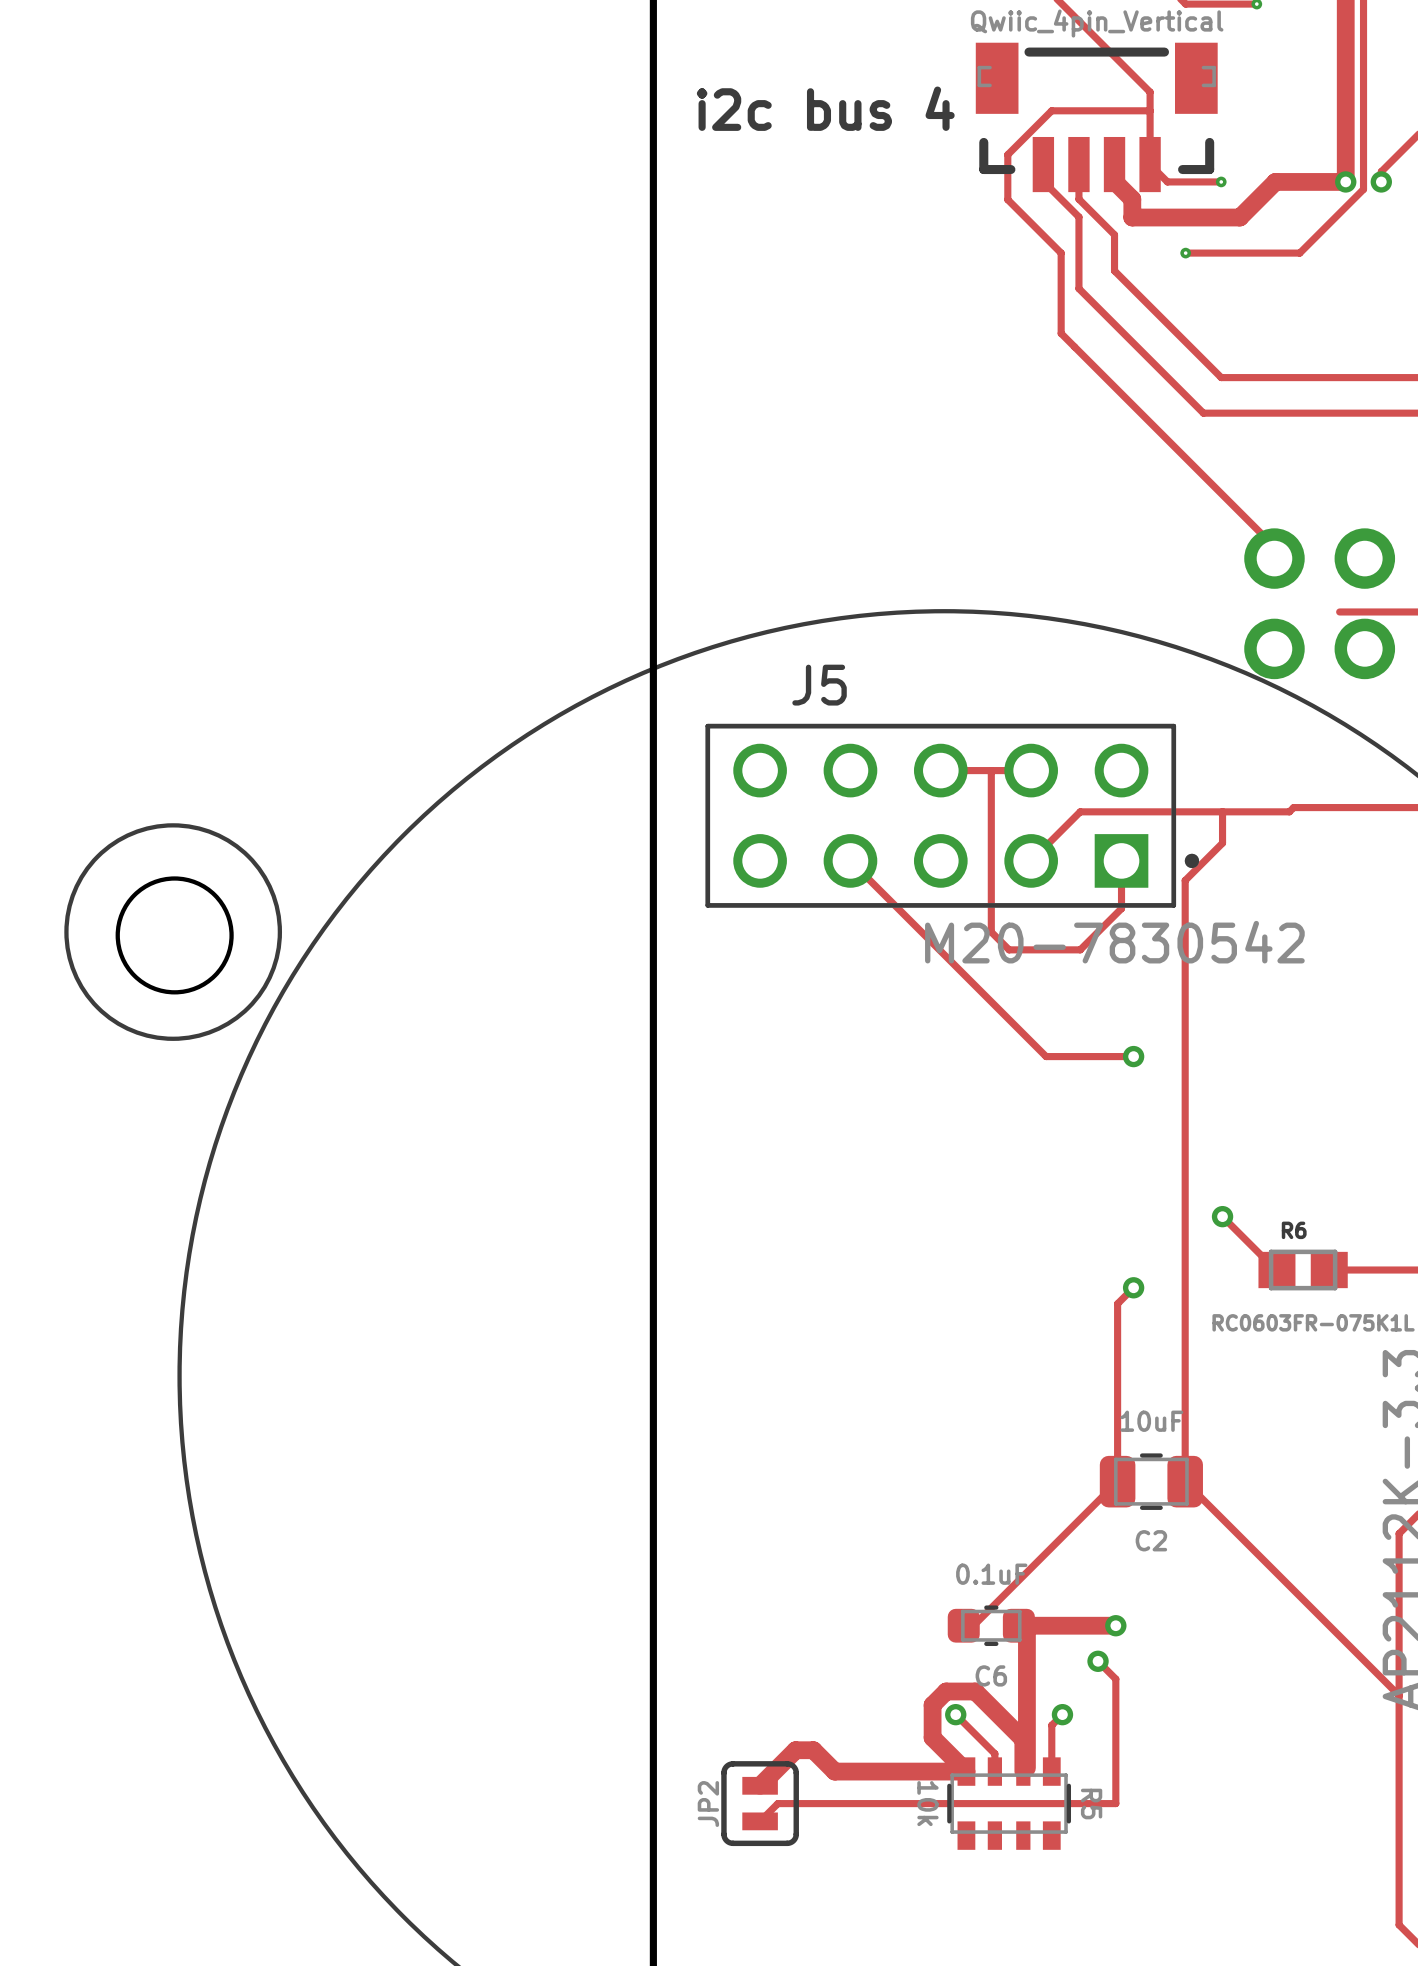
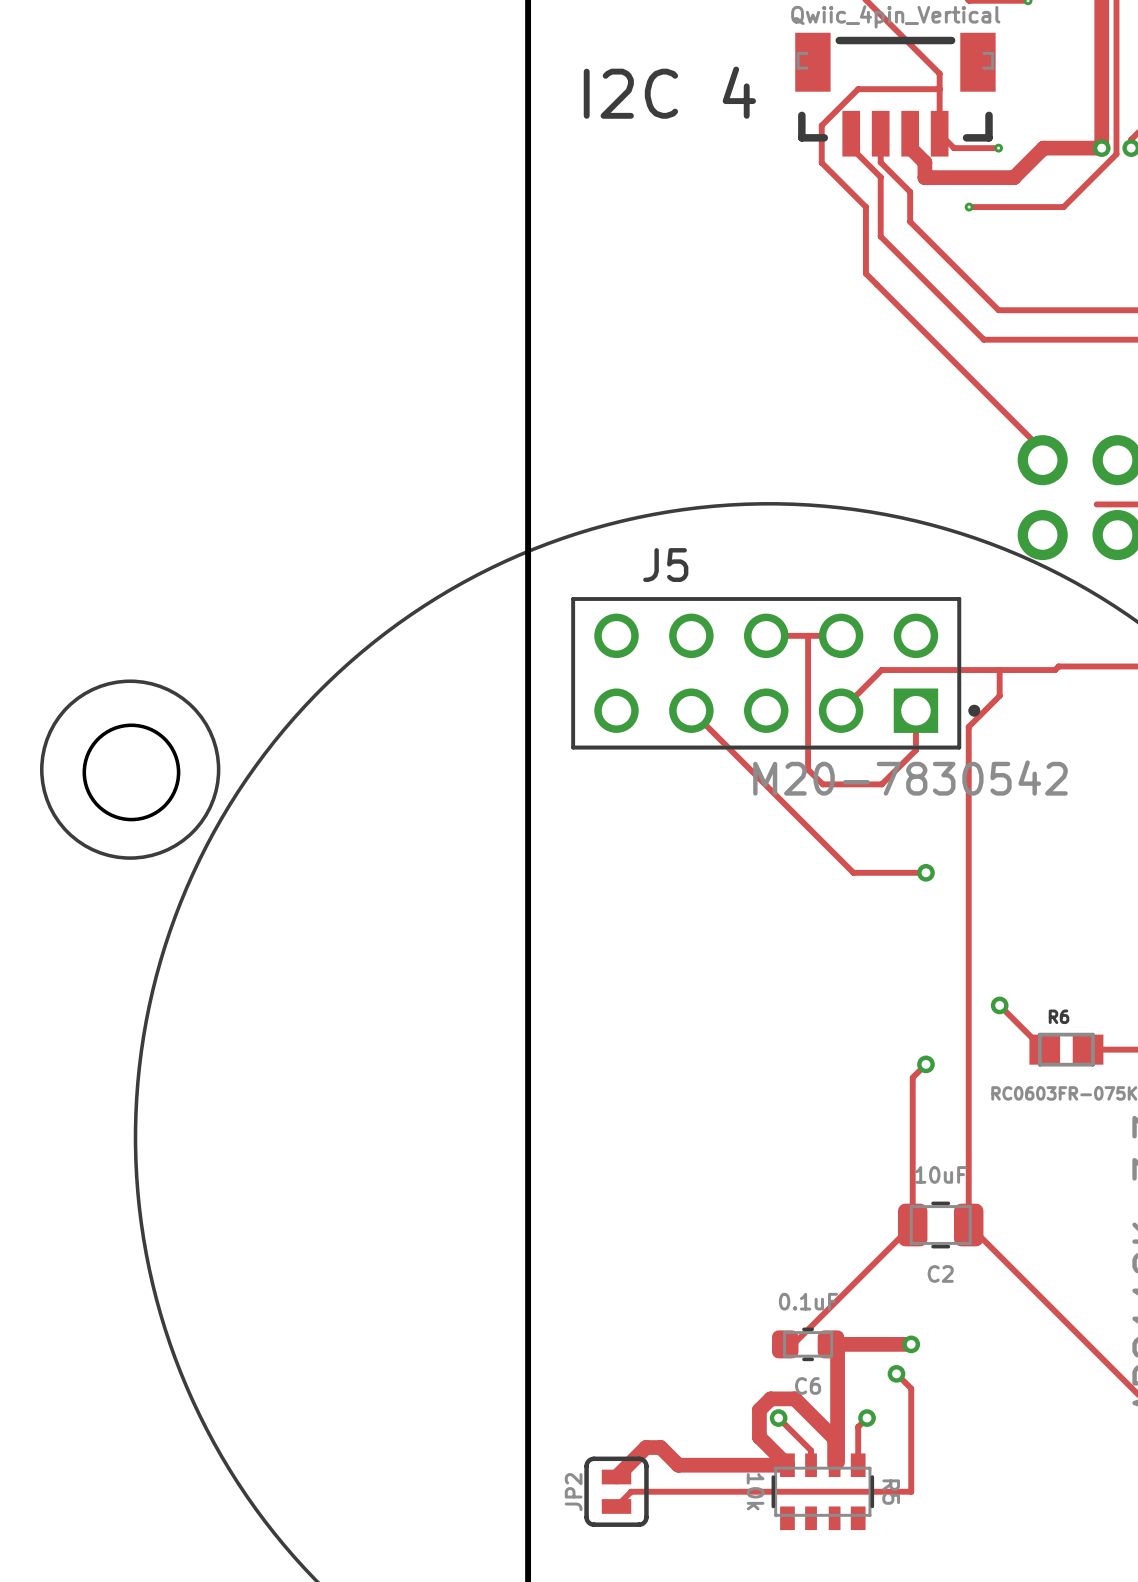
text: i2c bus 4 (825, 108) -> I2C 4 (669, 92)

